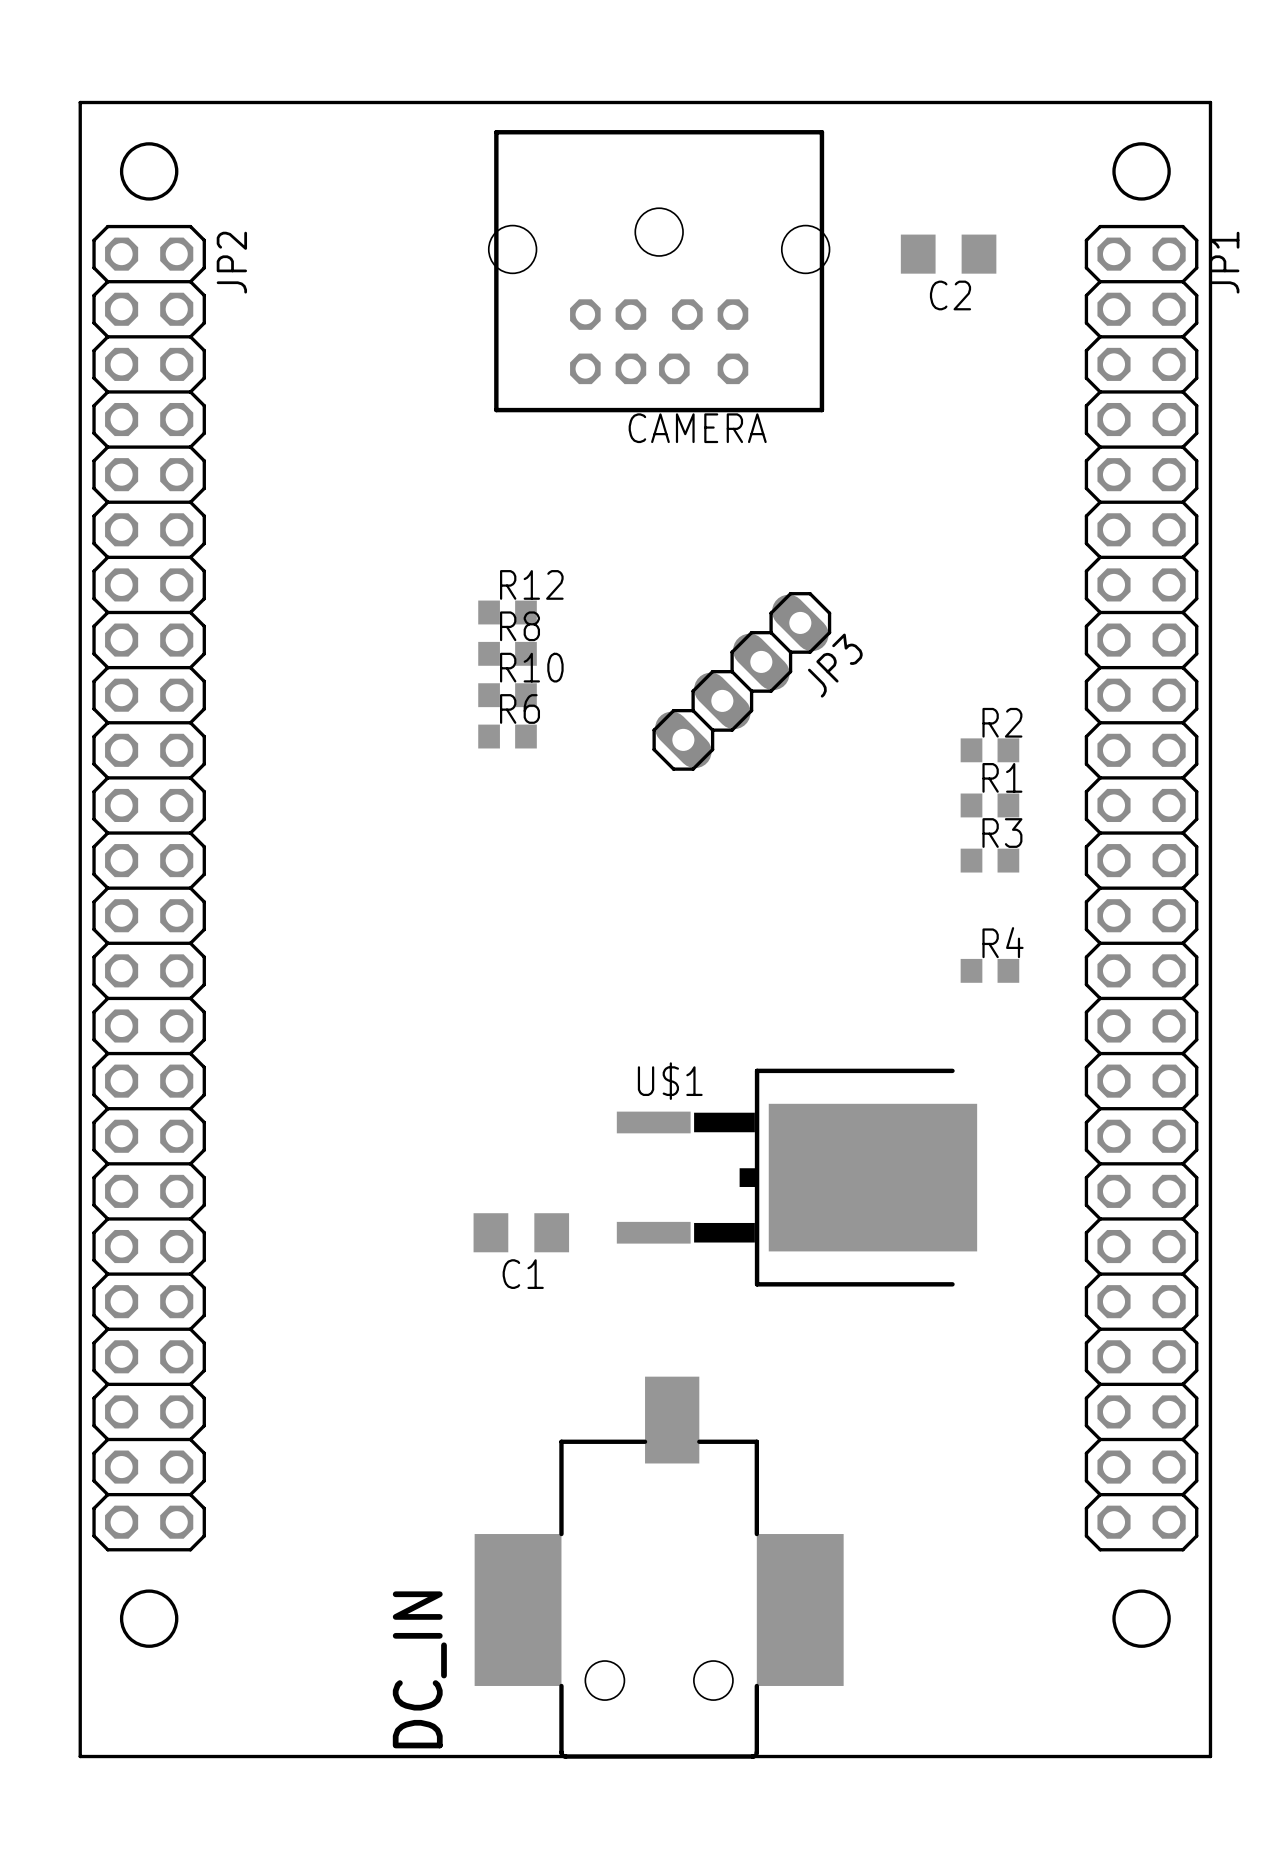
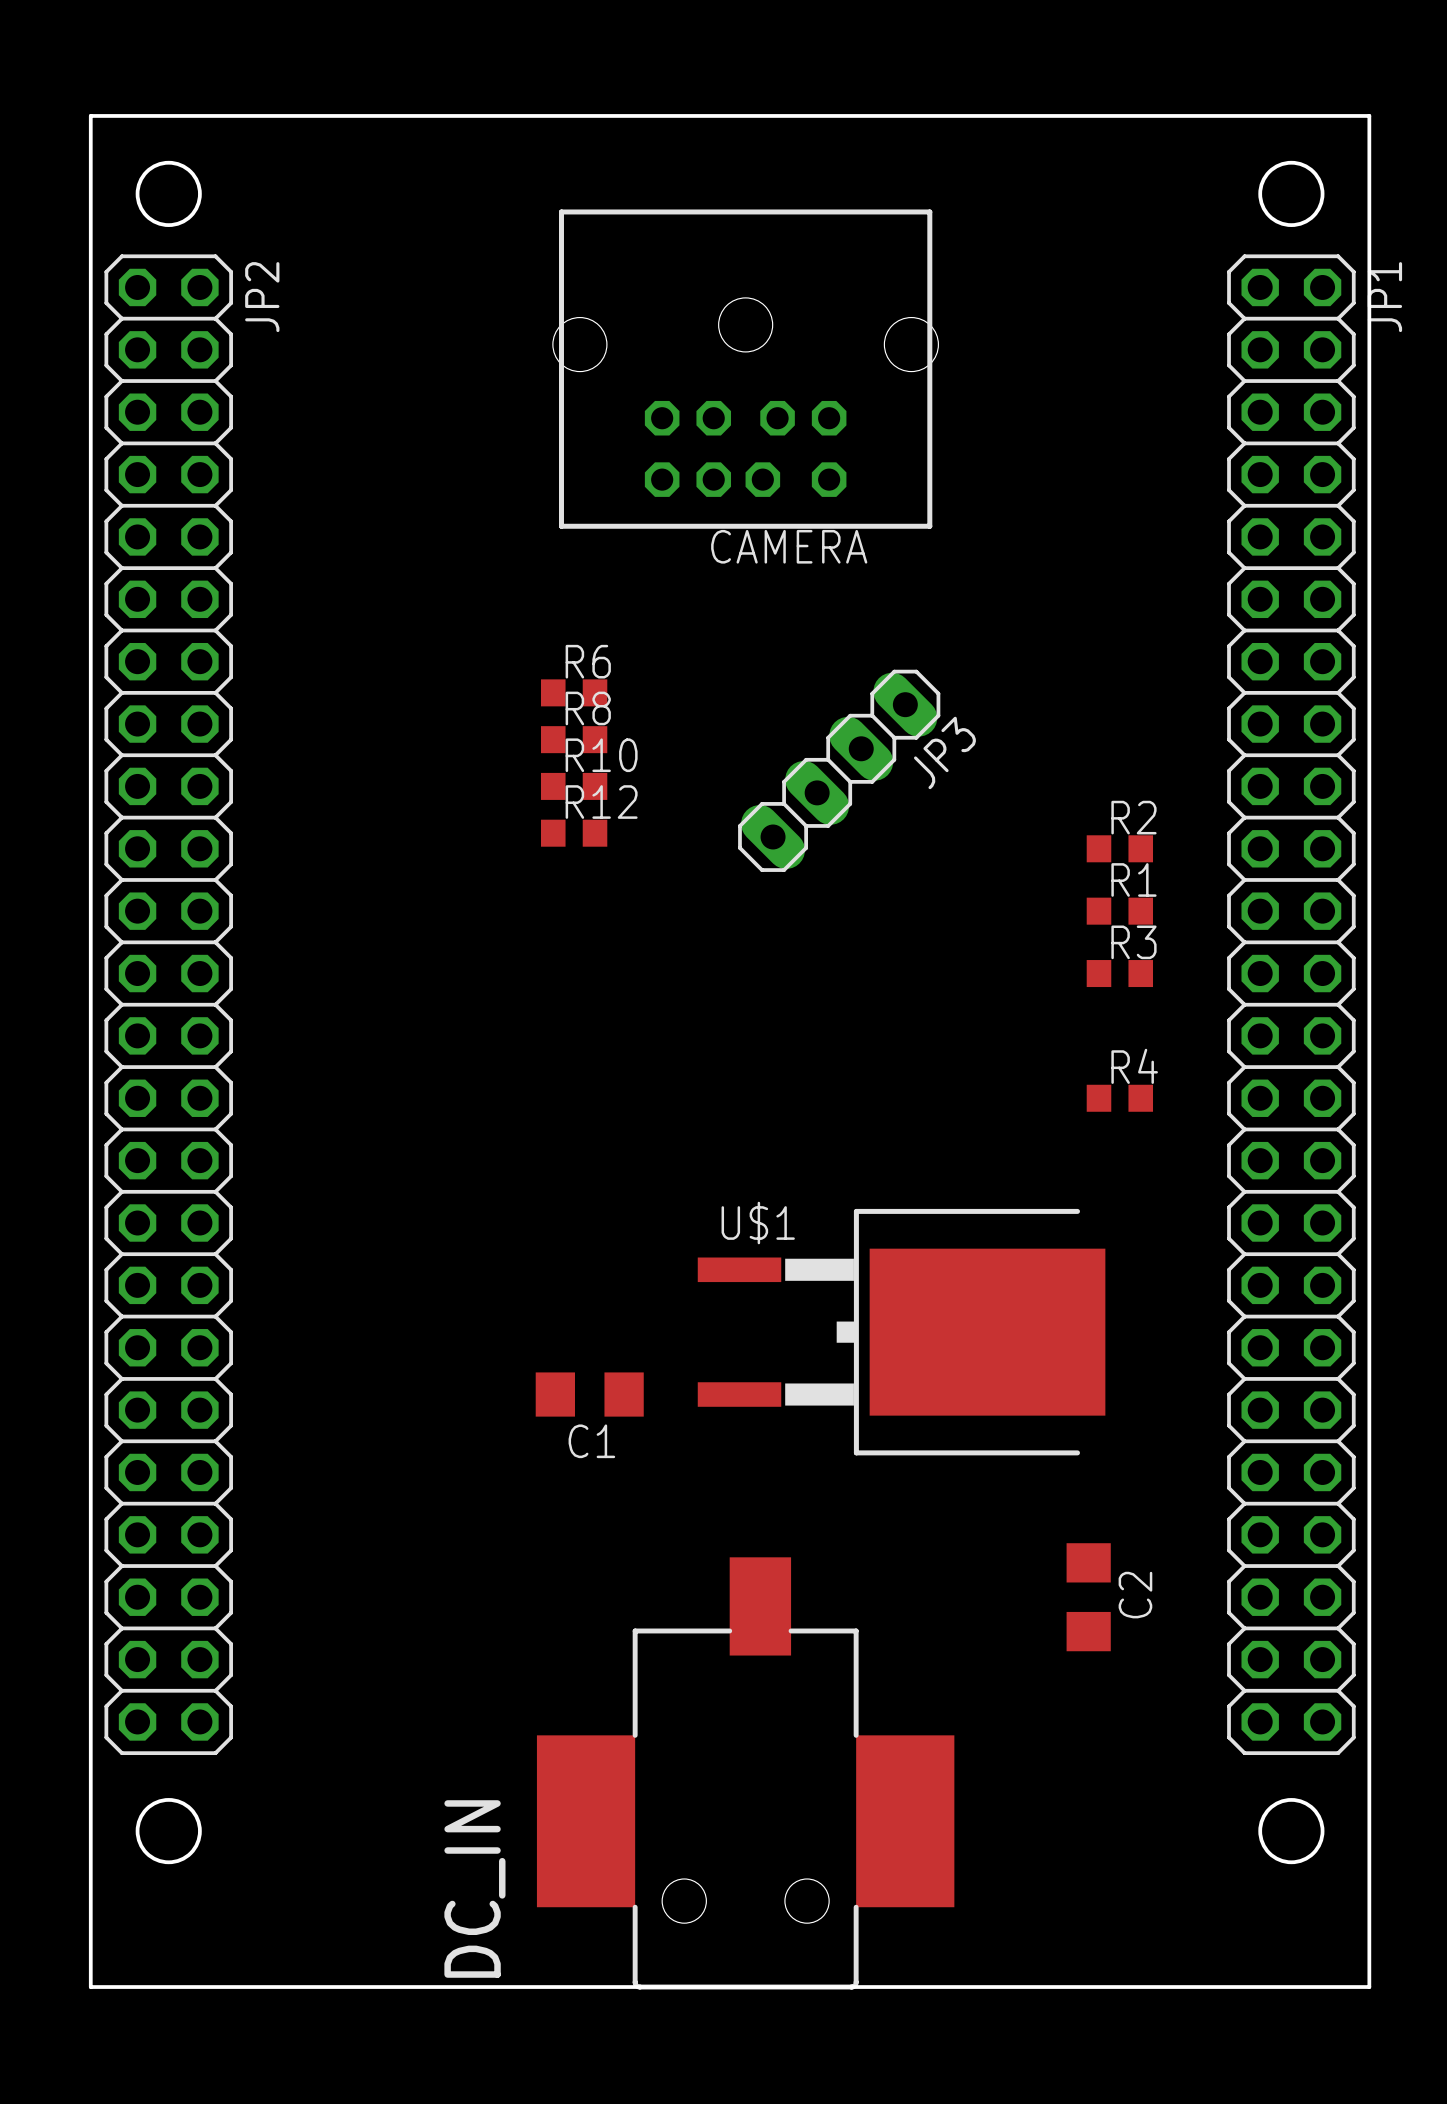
C2 rotation: 0° (948, 254) -> 90° clockwise (1088, 1597)
C2 position: (948, 254) -> (1088, 1597)
CAMERA position: (659, 271) -> (745, 369)
C2 name position: C2 (950, 295) -> C2 (1135, 1595)
R12 name: R12 (531, 584) -> R6 (588, 661)
R6 name: R6 (520, 708) -> R12 (601, 802)

